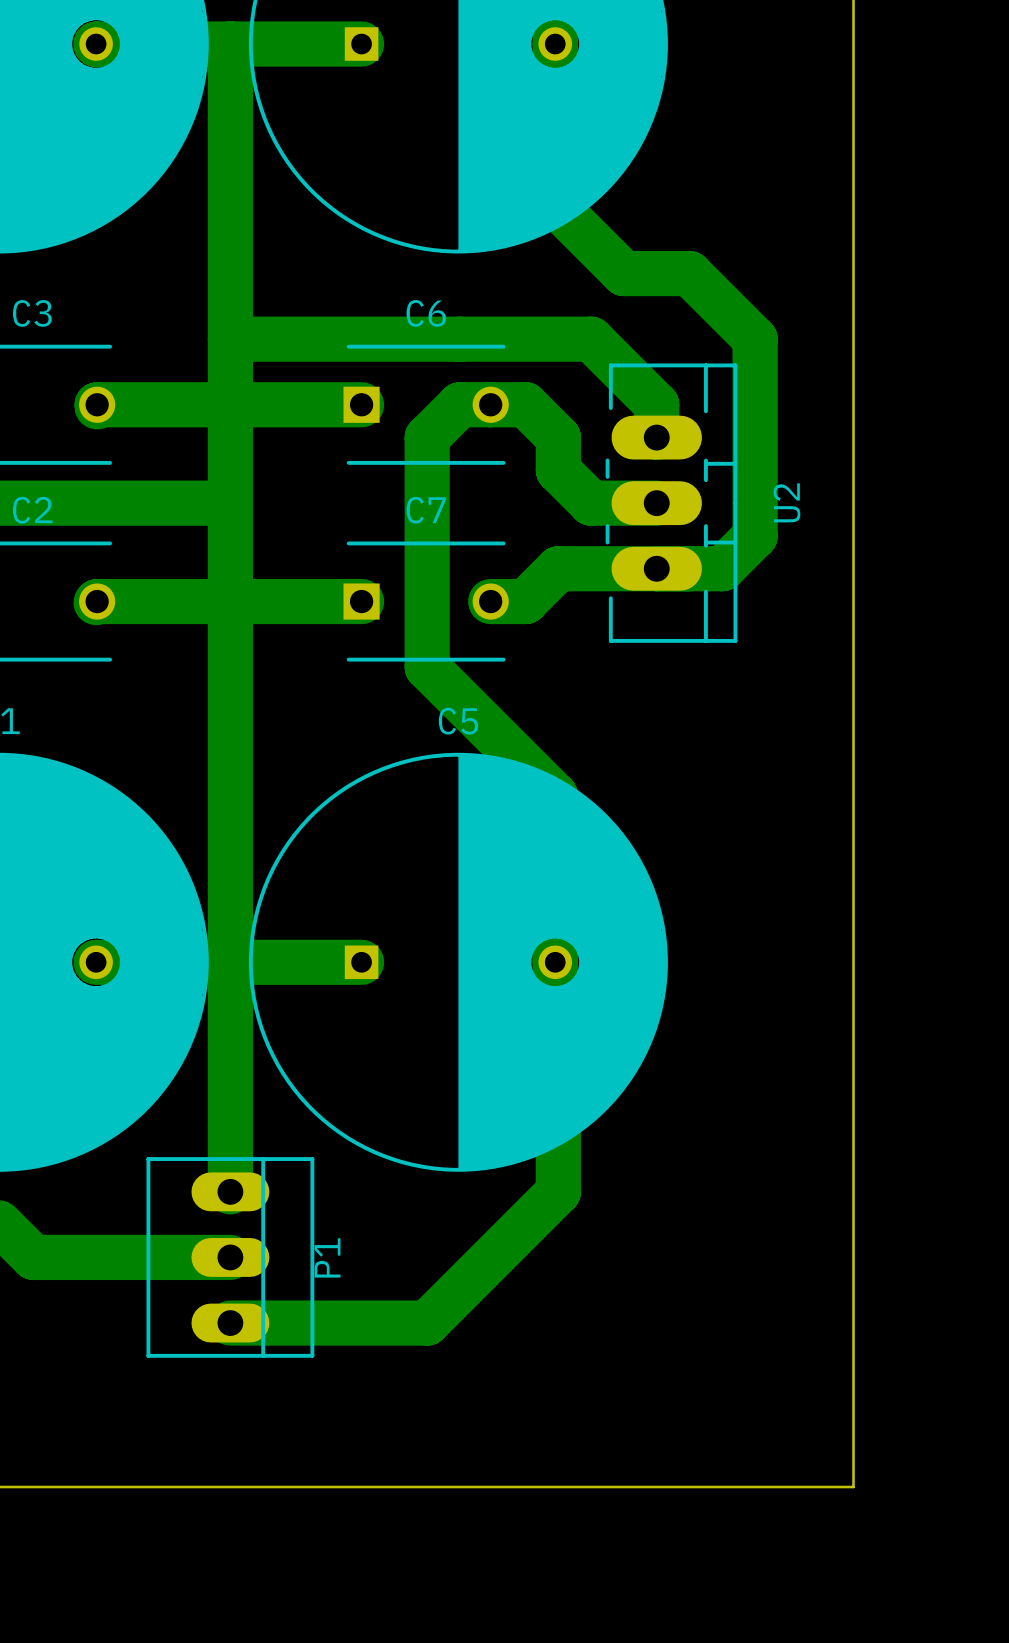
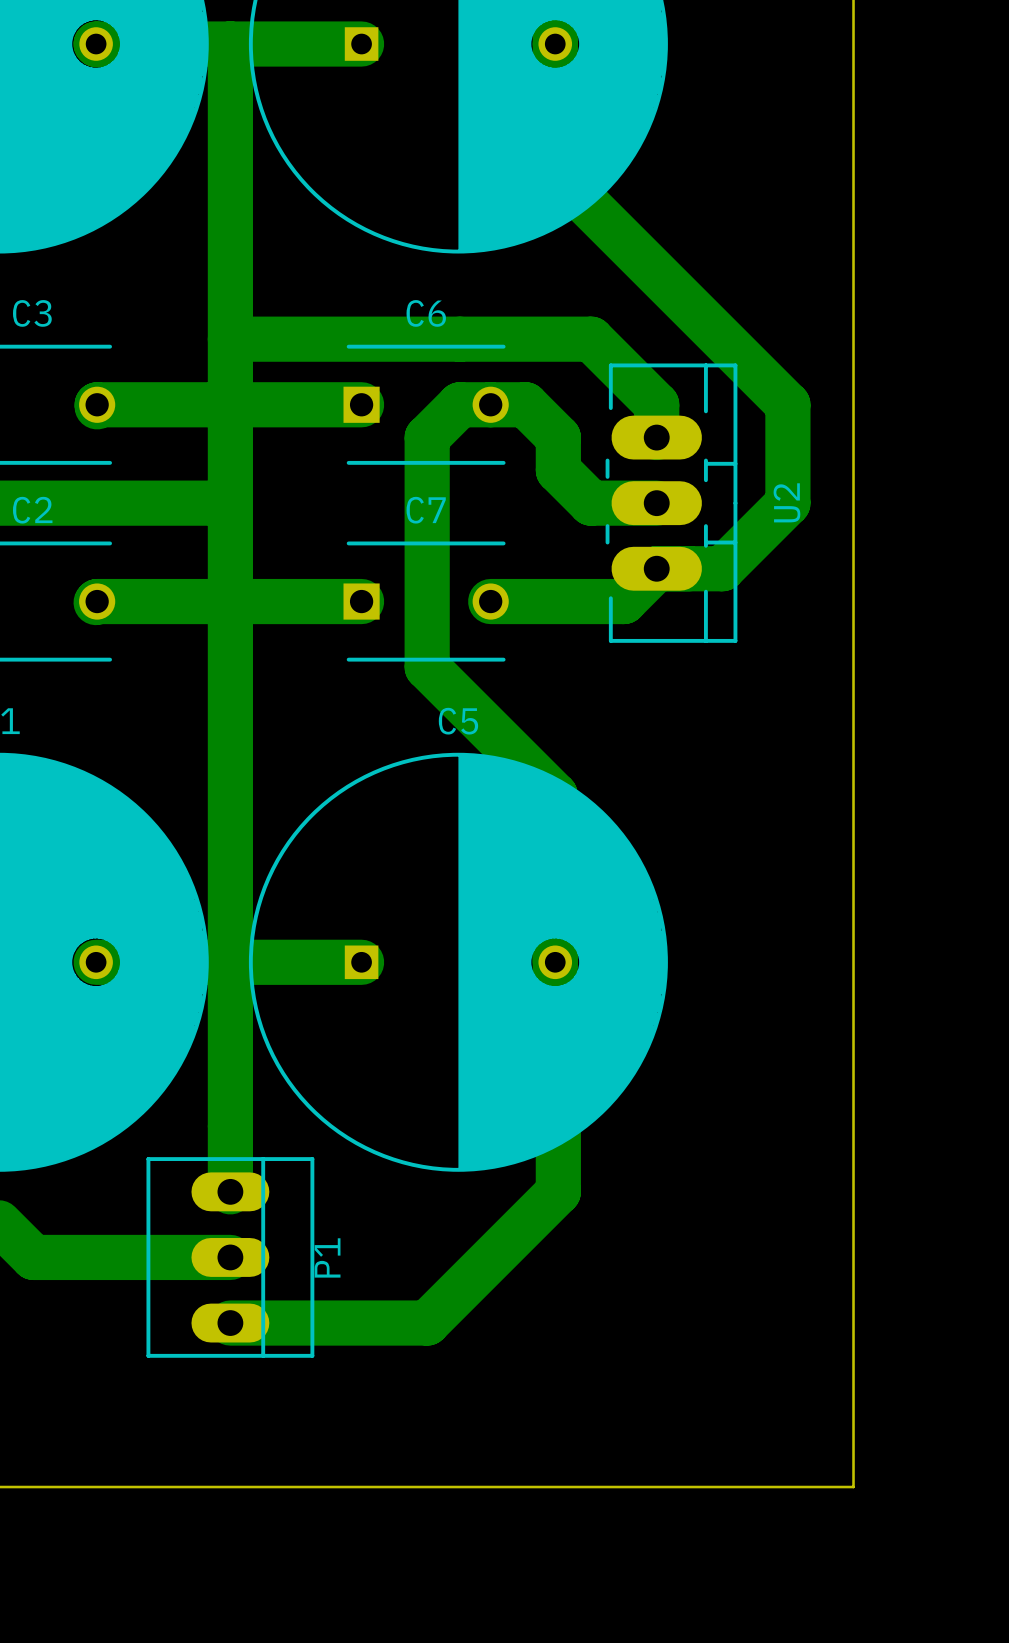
bottom track: (555, 175) (555, 204) (623, 273) (689, 273) (755, 339) (755, 535) -> (555, 175) (558, 175) (787, 404) (787, 503) (755, 535)
bottom track: (656, 568) (558, 568) (525, 601) -> (656, 568) (623, 601) (525, 601)

